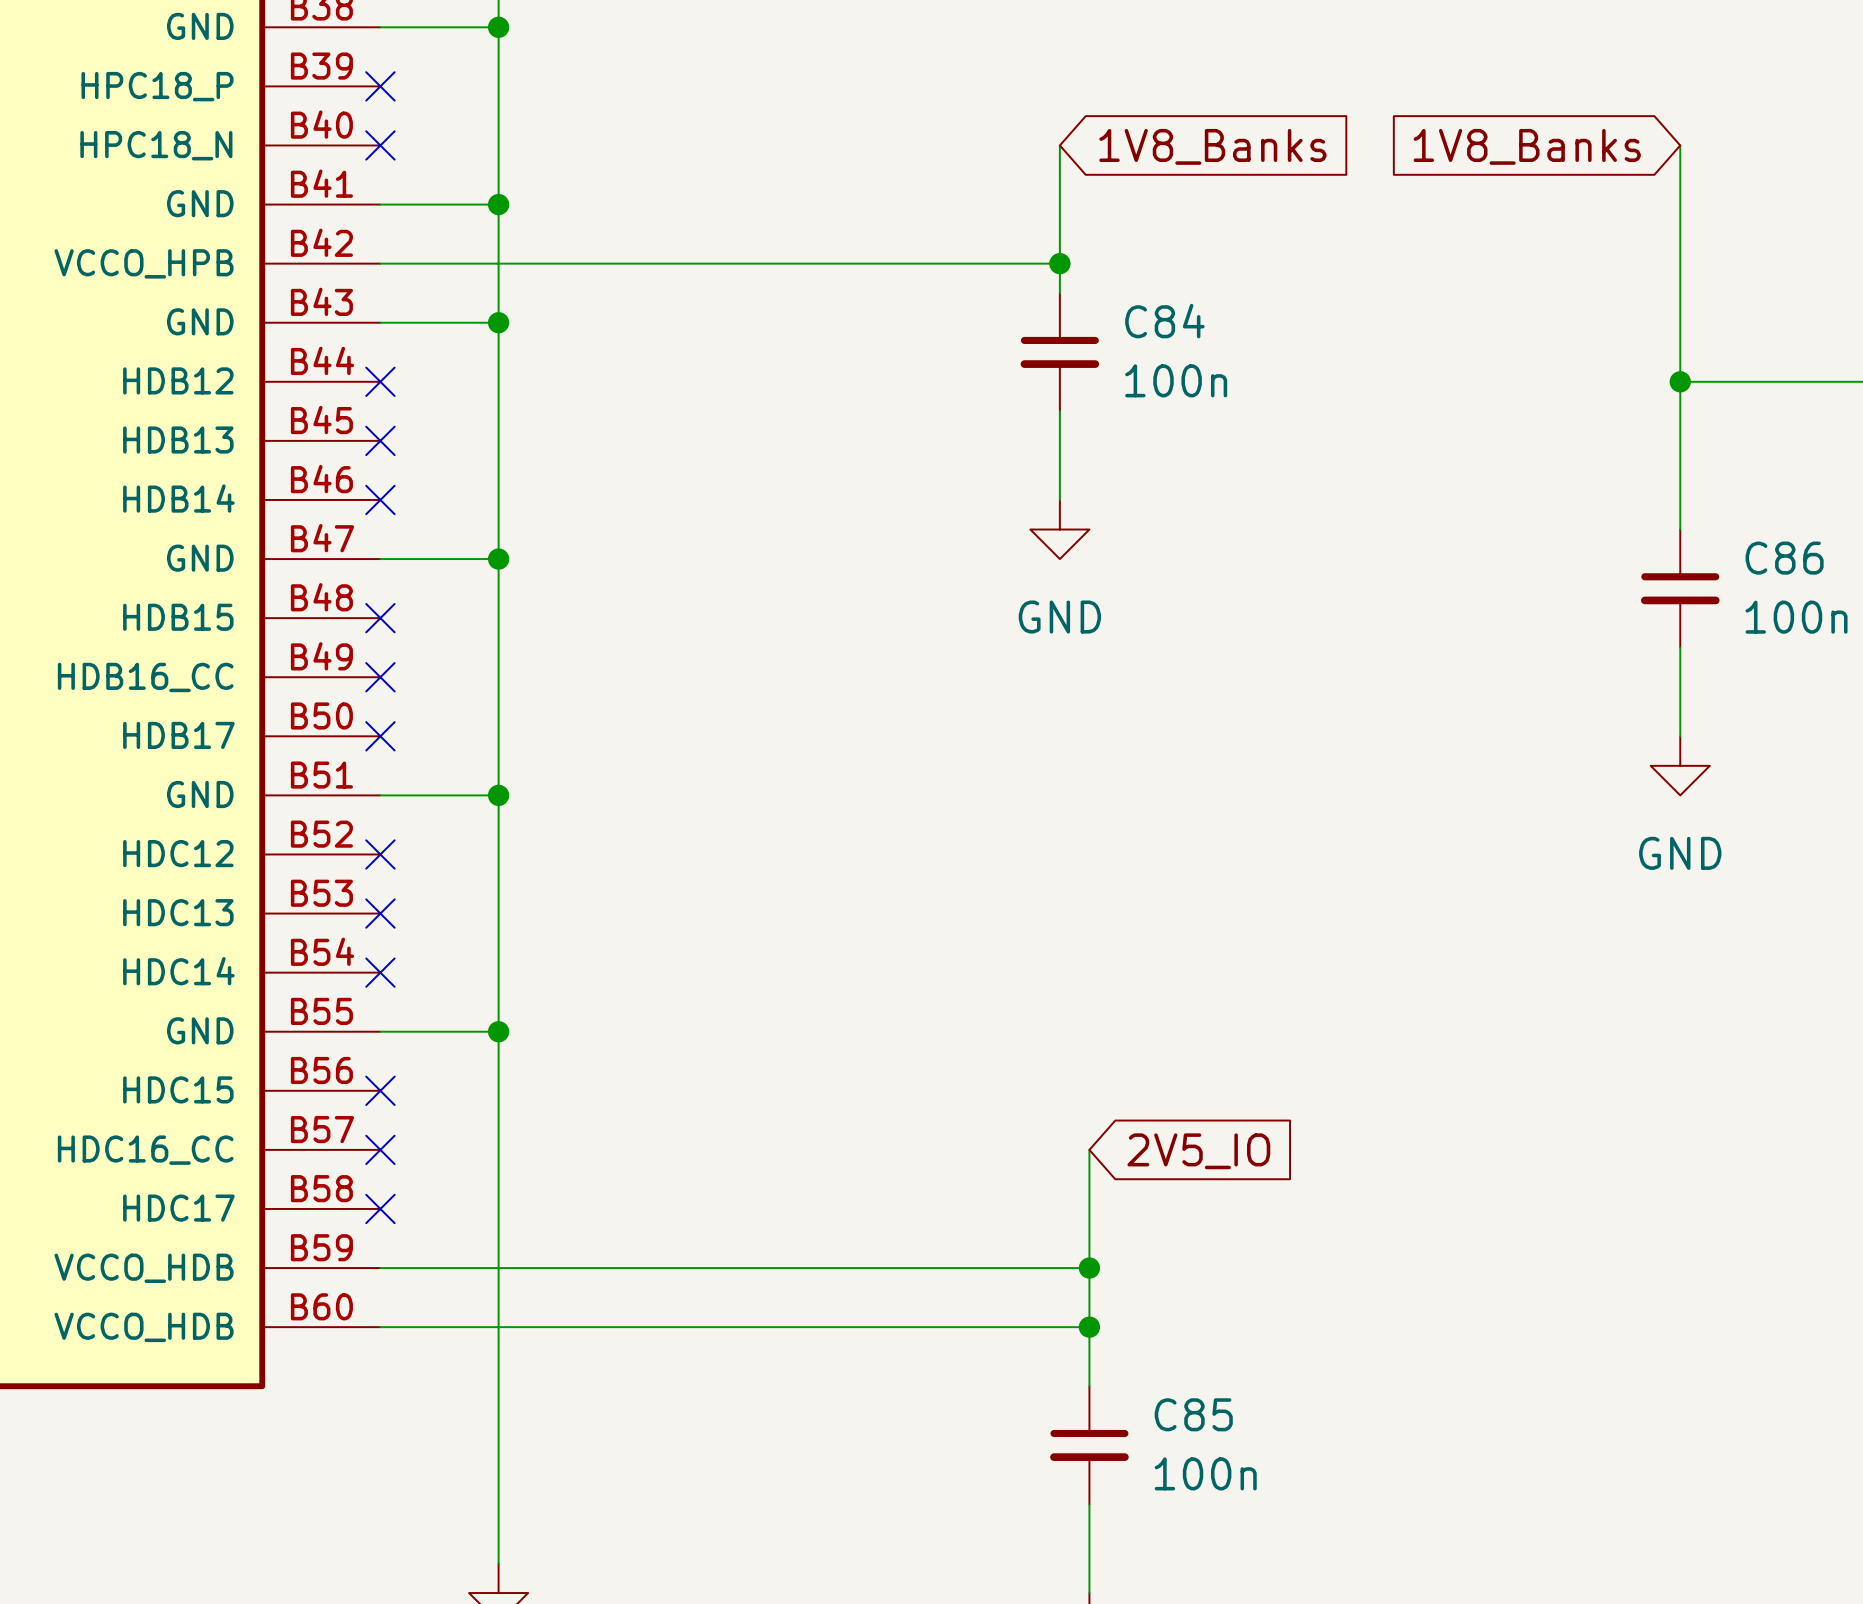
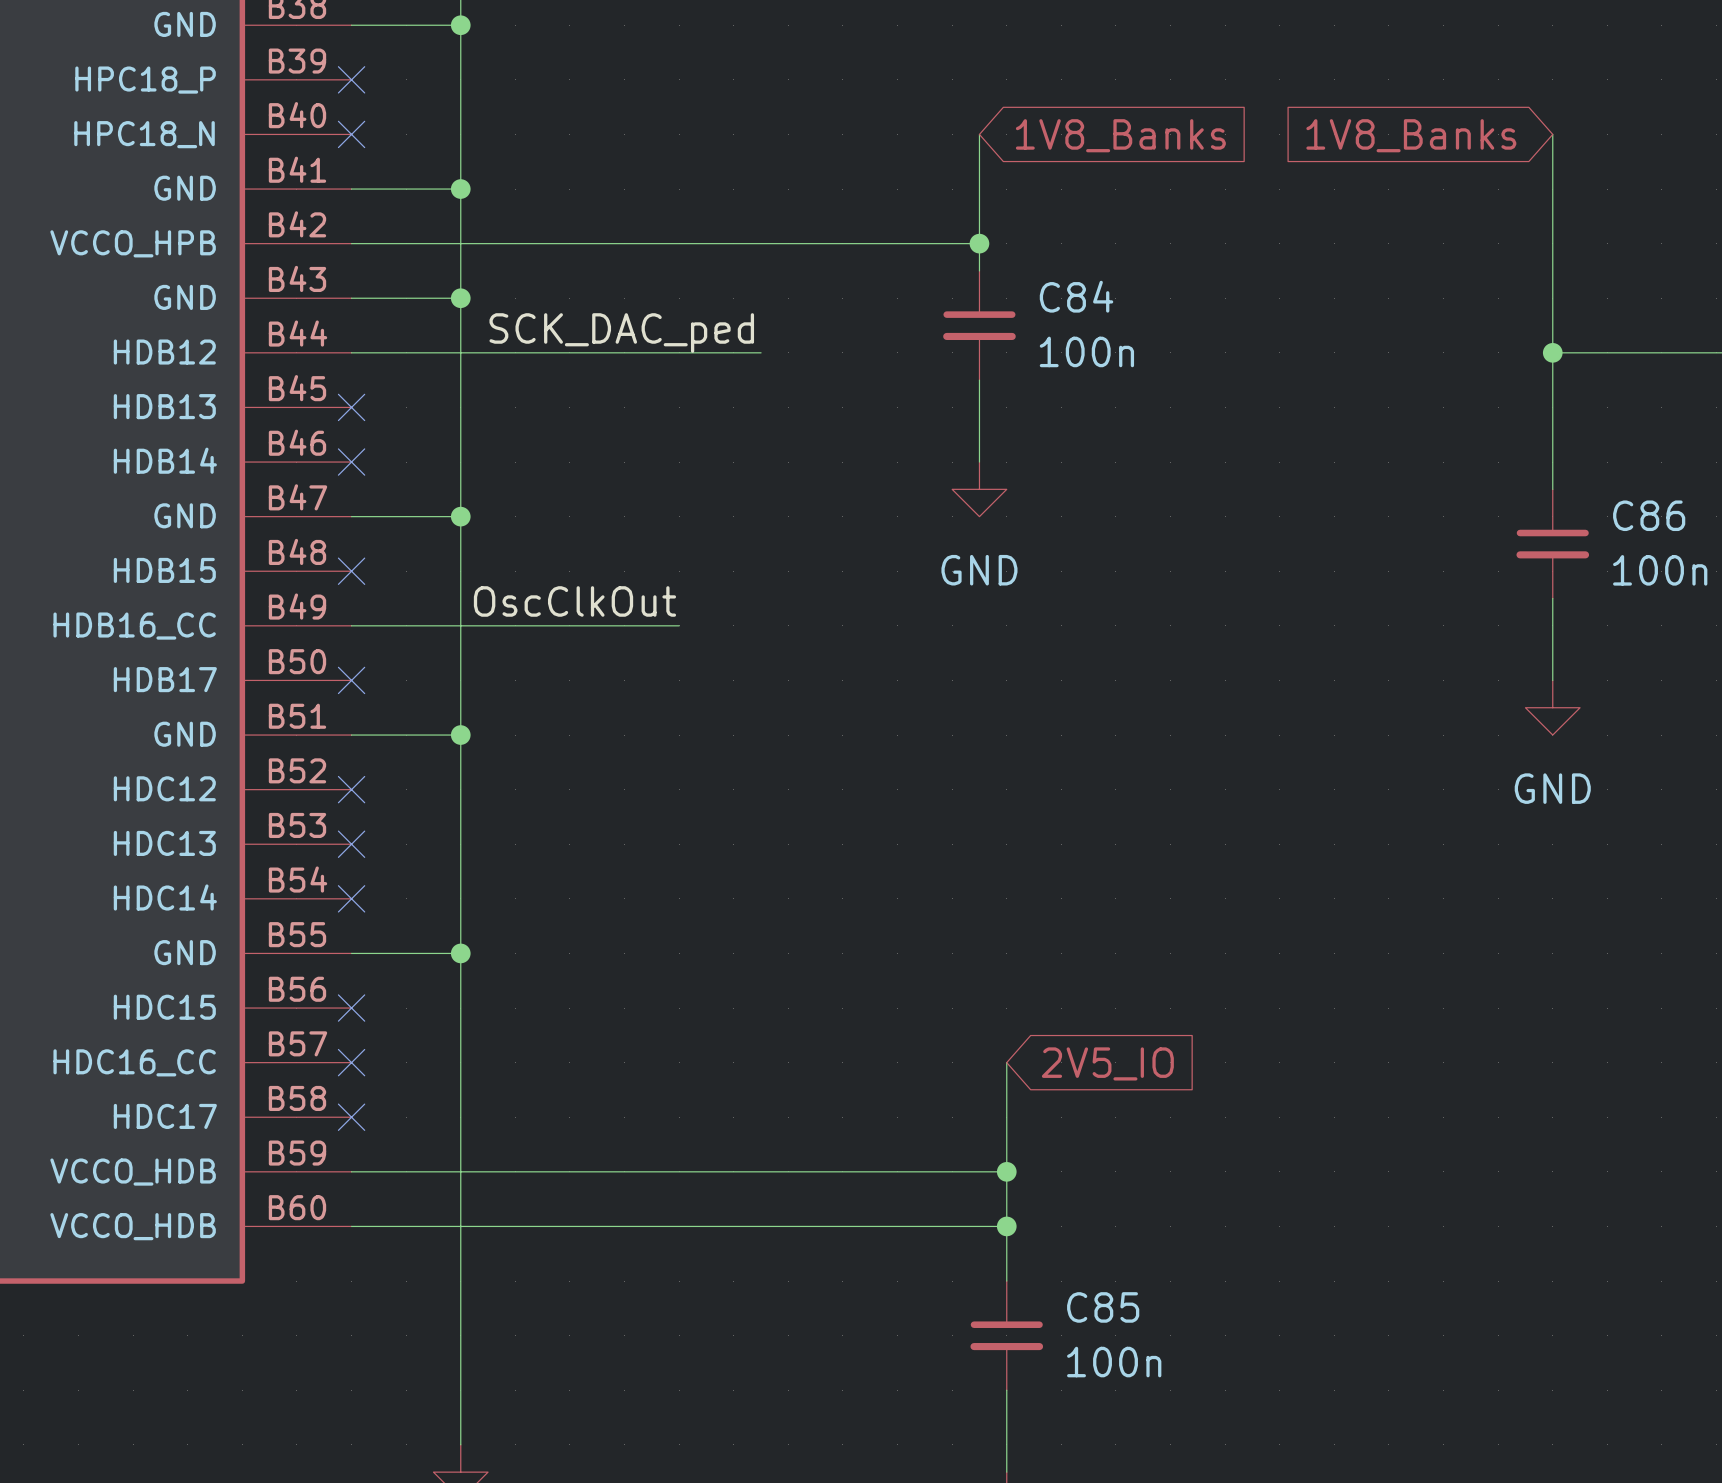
label: none -> SCK_DAC_ped (621, 333)
wire: none -> (351, 352) (761, 352)
no-connect mark: (380, 381) -> none
label: none -> OscClkOut (574, 601)
wire: none -> (351, 625) (679, 625)
no-connect mark: (380, 677) -> none

